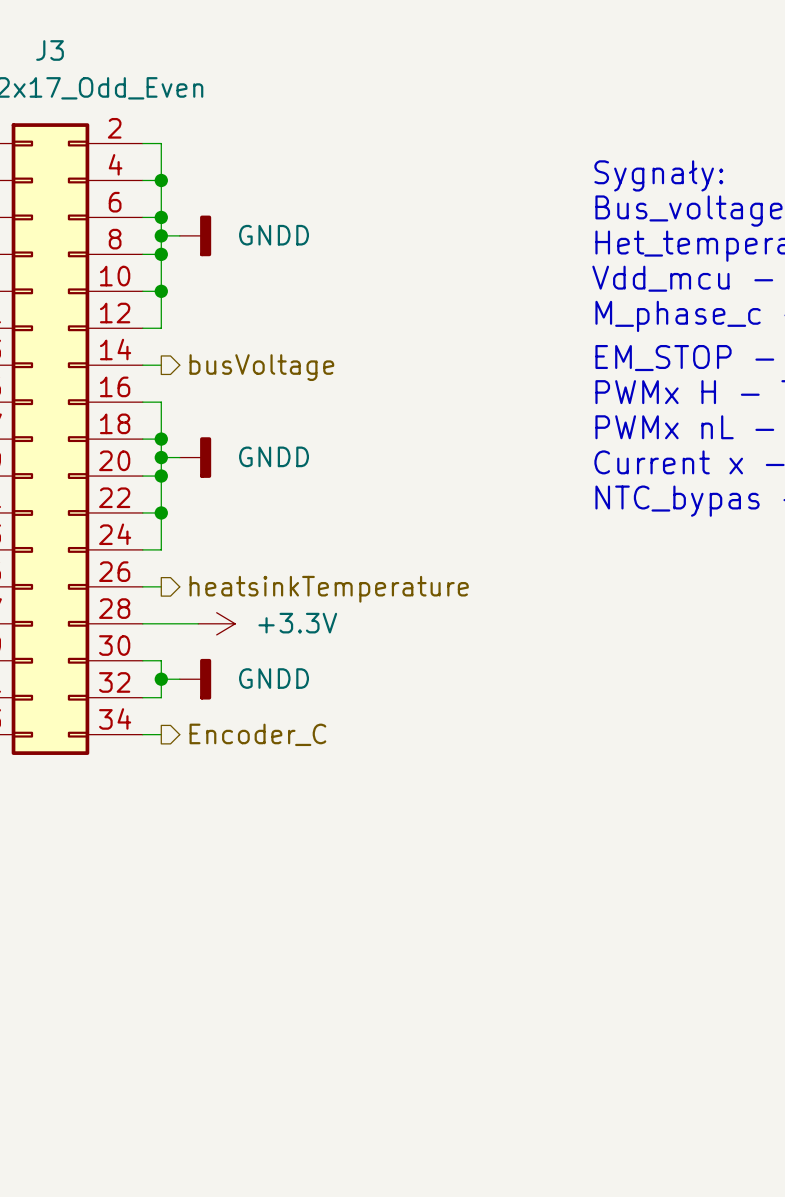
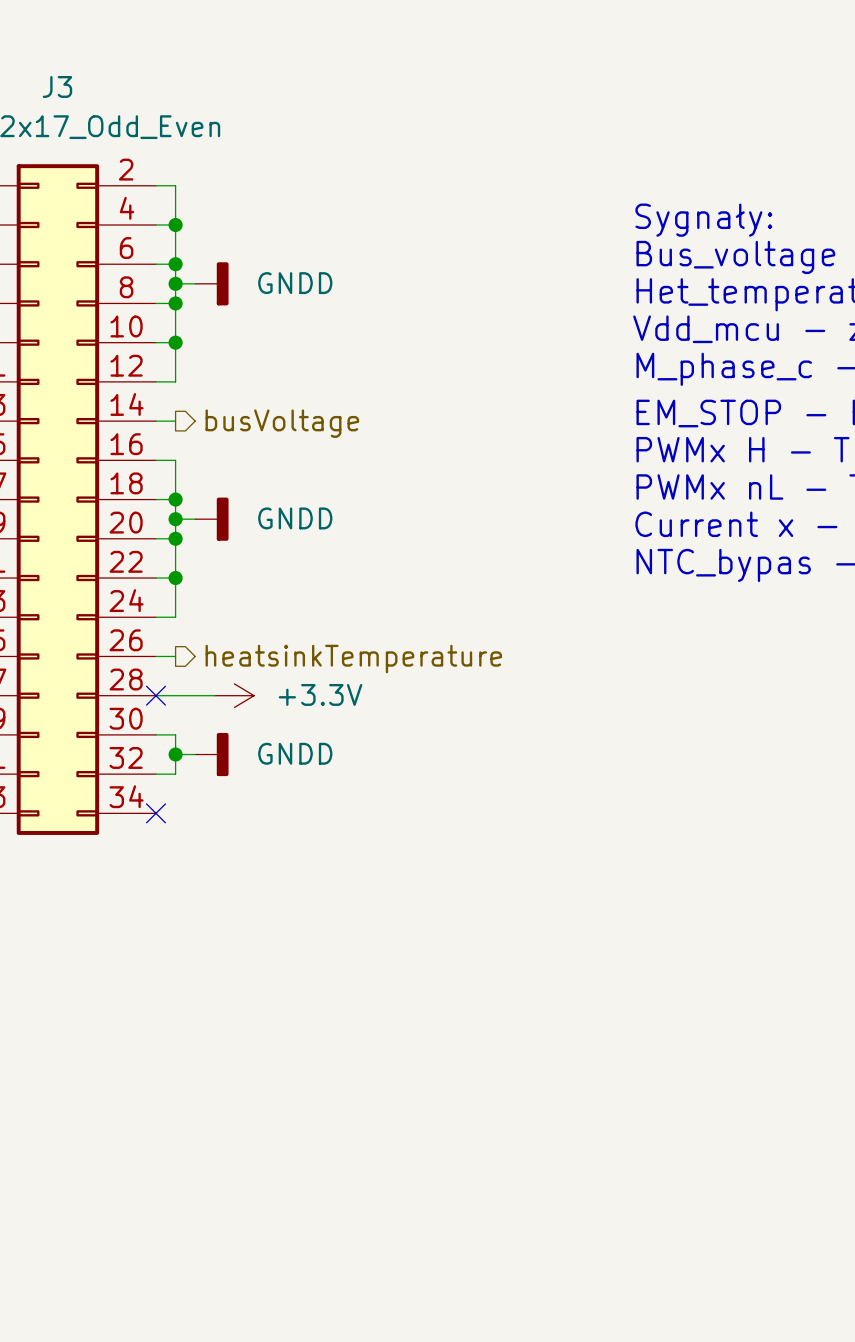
no-connect mark: none -> (155, 695)
wire: (142, 734) (161, 734) -> none
no-connect mark: none -> (155, 813)
hierarchical label: Encoder_C (257, 734) -> none

